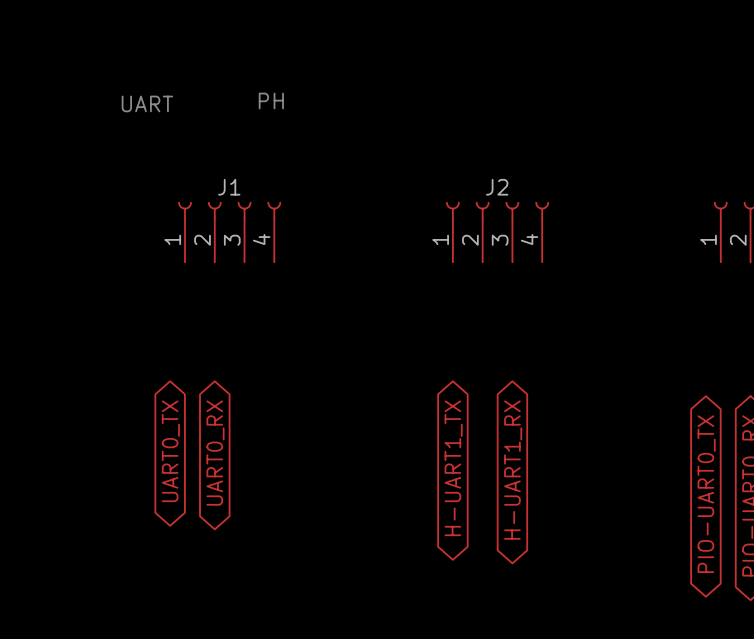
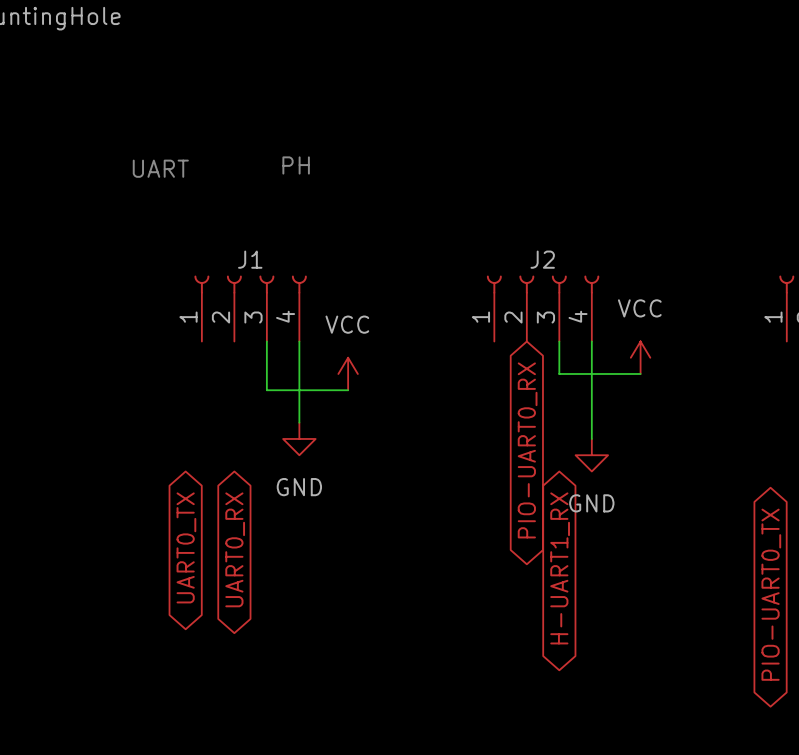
wire: none -> (266, 341) (266, 390) (348, 390)
wire: none -> (299, 341) (299, 422)
wire: none -> (559, 341) (559, 373) (640, 373)
wire: none -> (591, 341) (591, 438)
power symbol: none -> VCC (640, 357)
power symbol: none -> VCC (348, 373)
power symbol: none -> GND (299, 438)
power symbol: none -> GND (591, 455)
global label: H-UART1_TX (453, 468) -> PIO-UART0_RX (527, 450)

